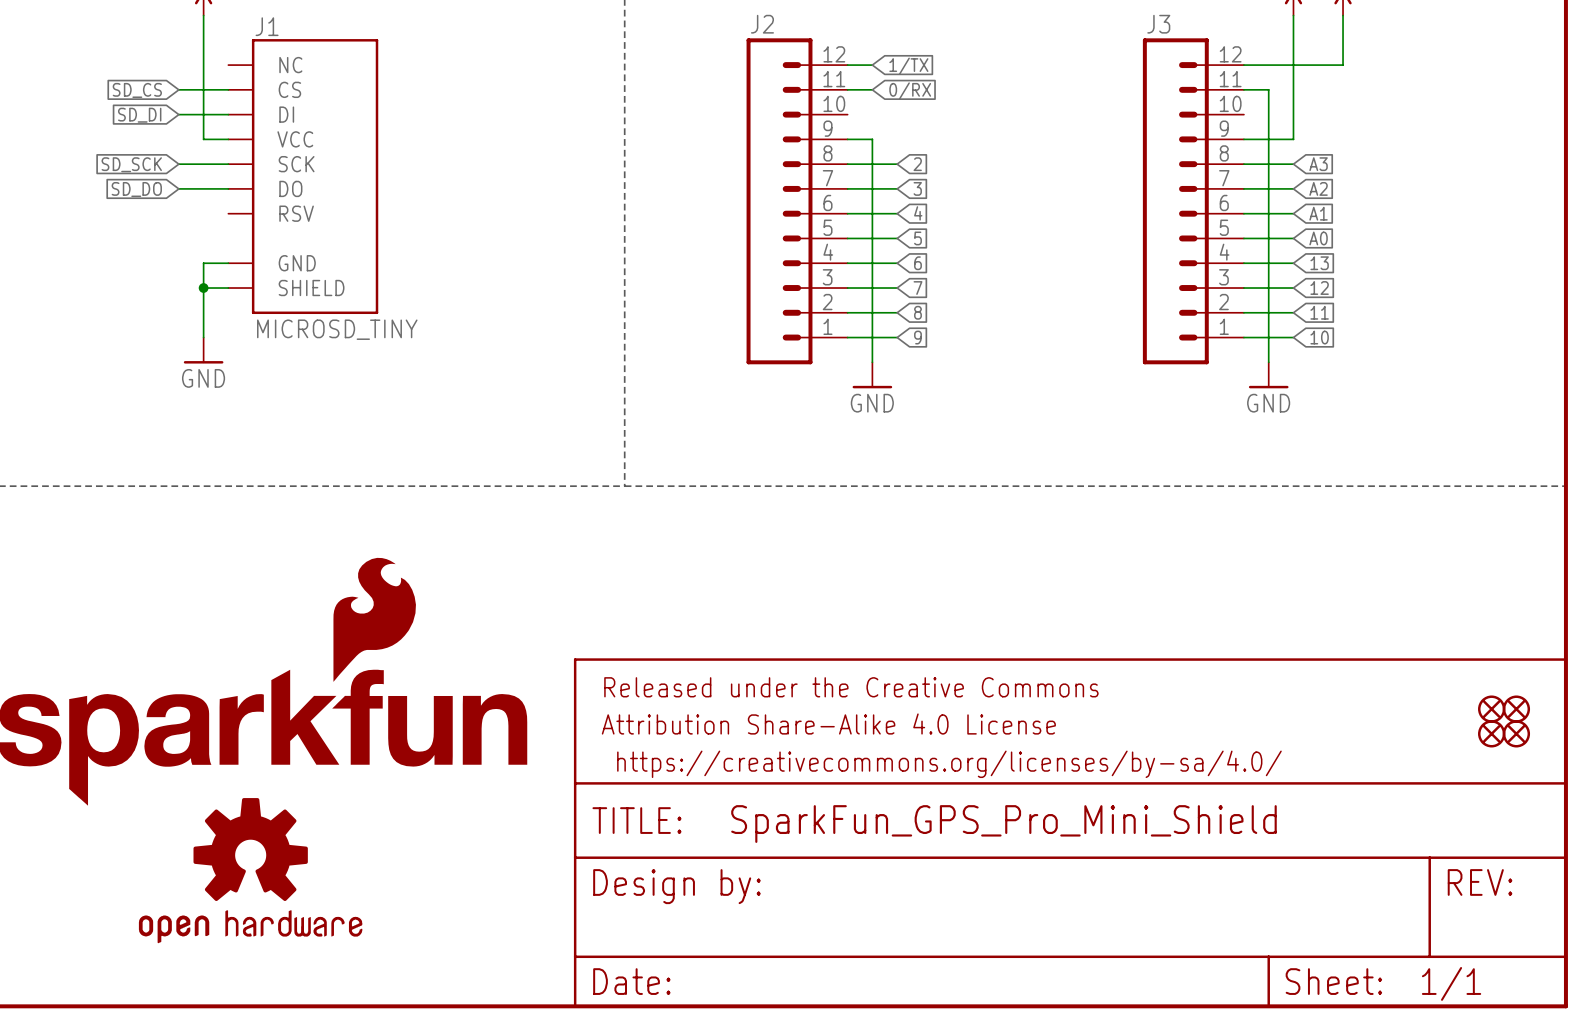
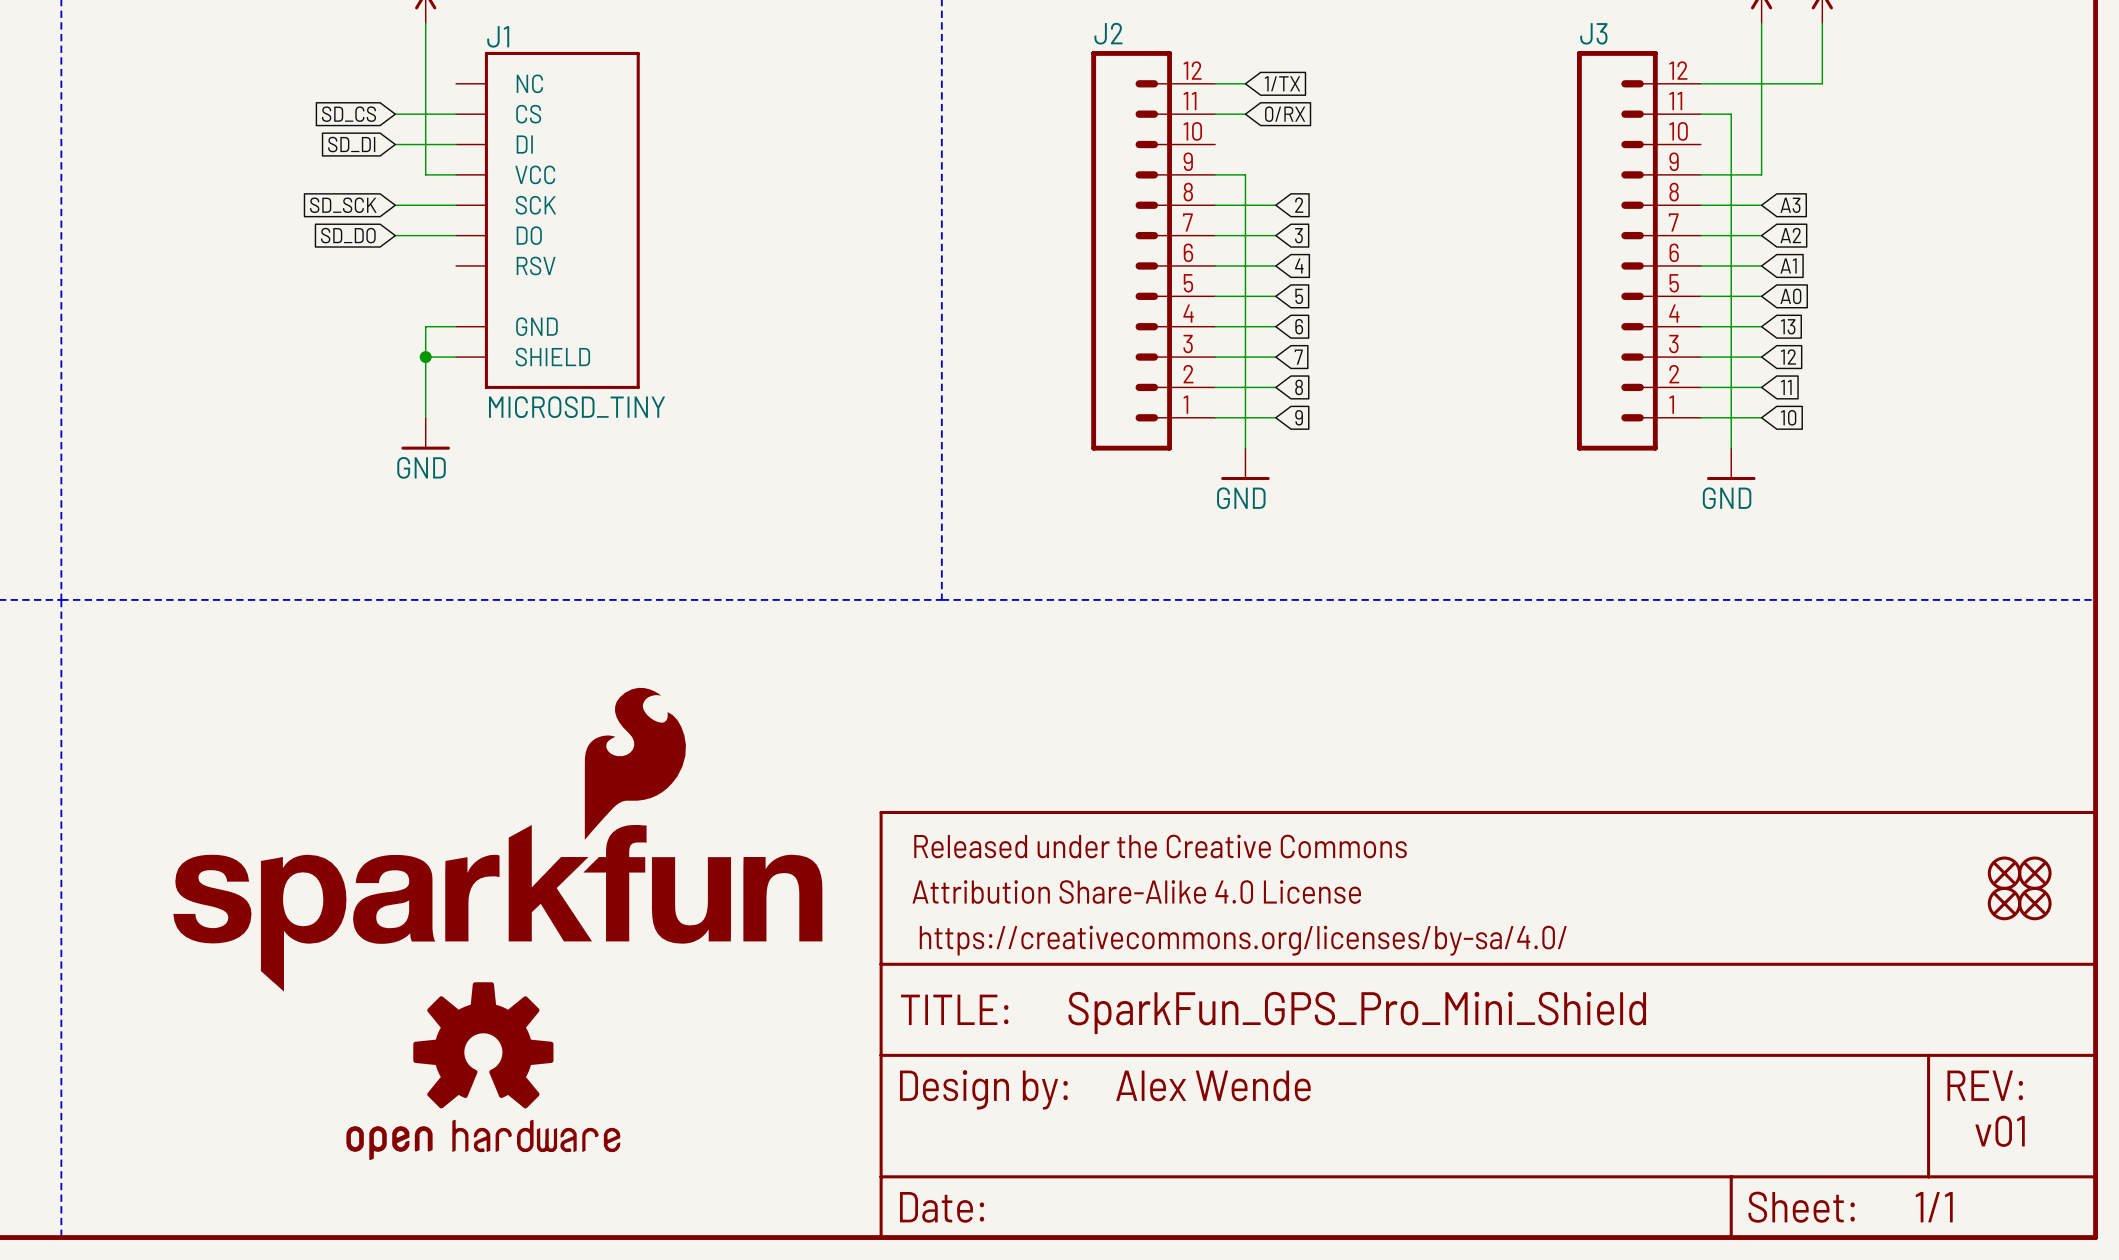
text: none -> Alex Wende (1213, 1085)
text: none -> v01 (2000, 1131)

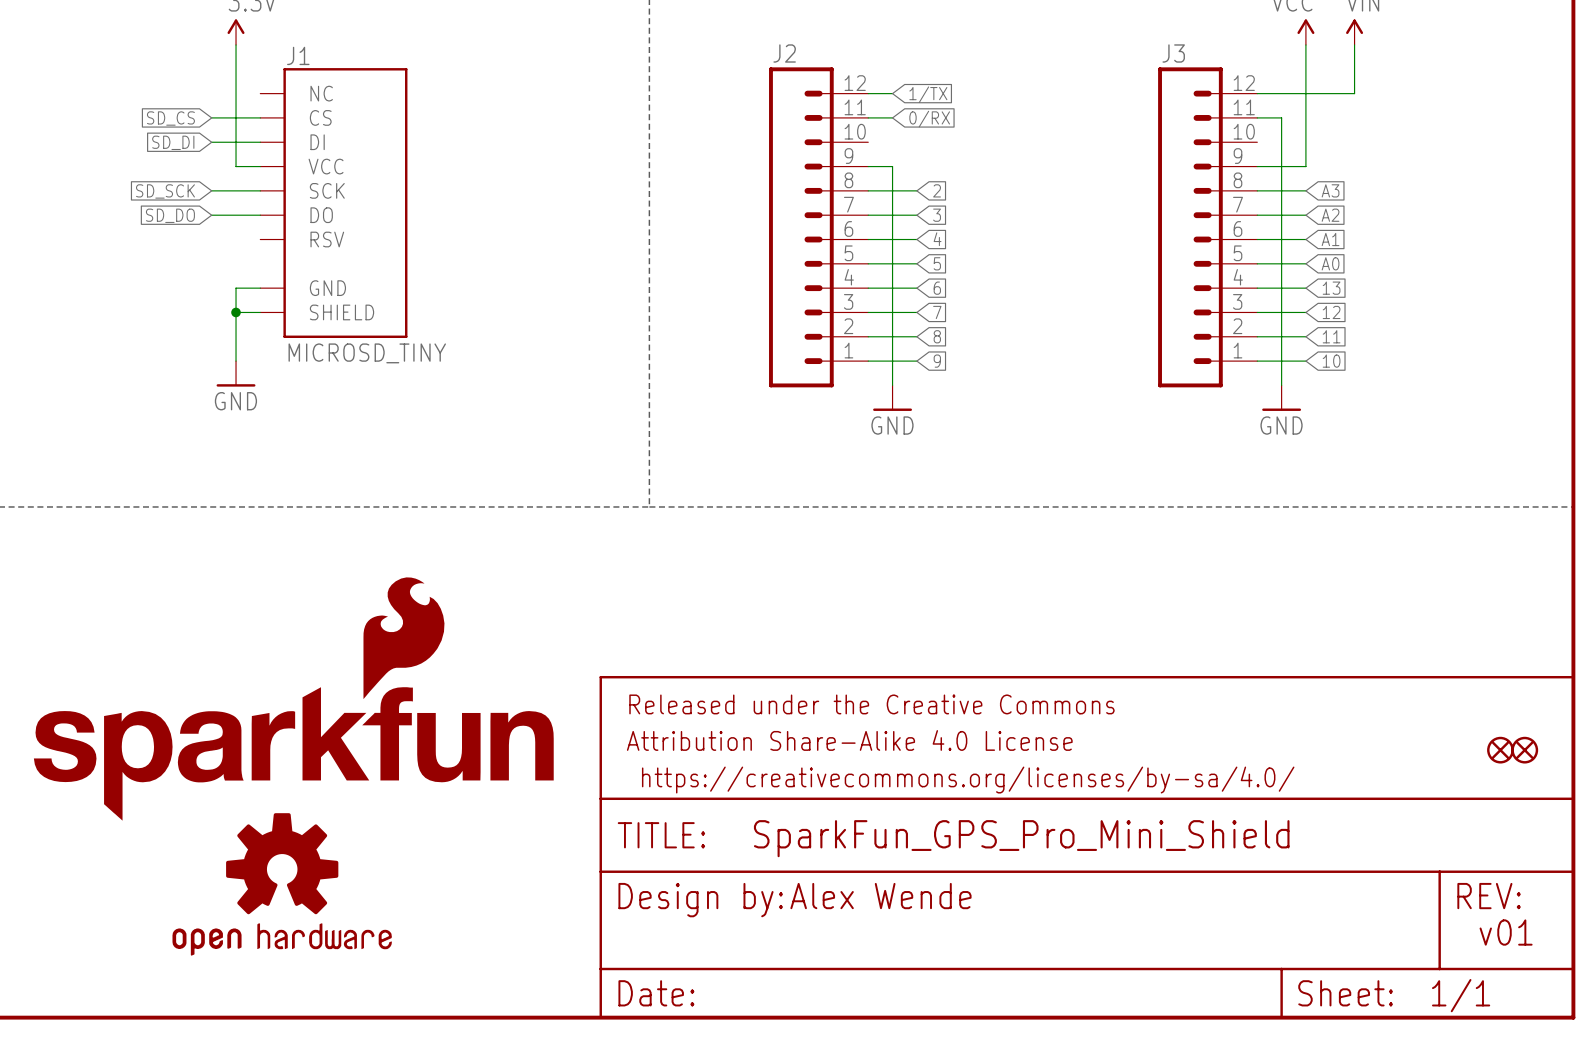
part: (2004, 873) -> none
part: (2034, 873) -> none

